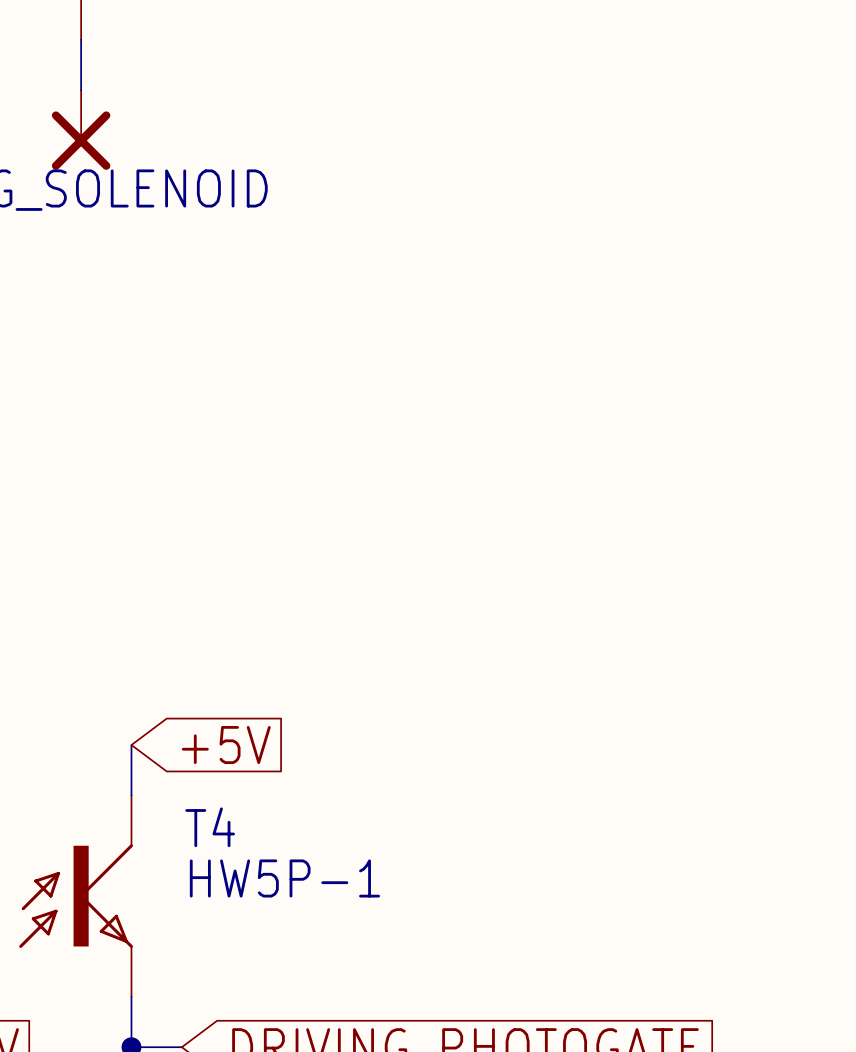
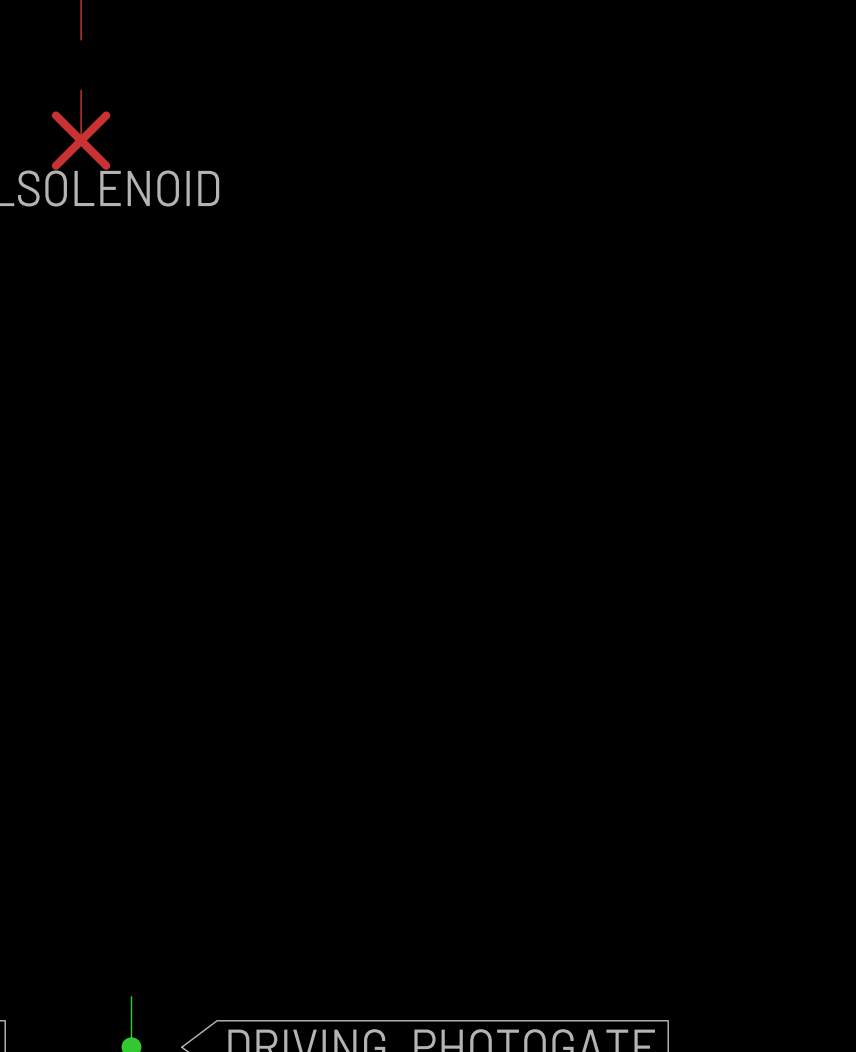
wire: (81, 39) (81, 90) -> none
wire: (131, 745) (131, 795) -> none
global label: +5V (226, 745) -> none
T4: HW5P-1 (76, 896) -> none
wire: (131, 1047) (181, 1047) -> none

